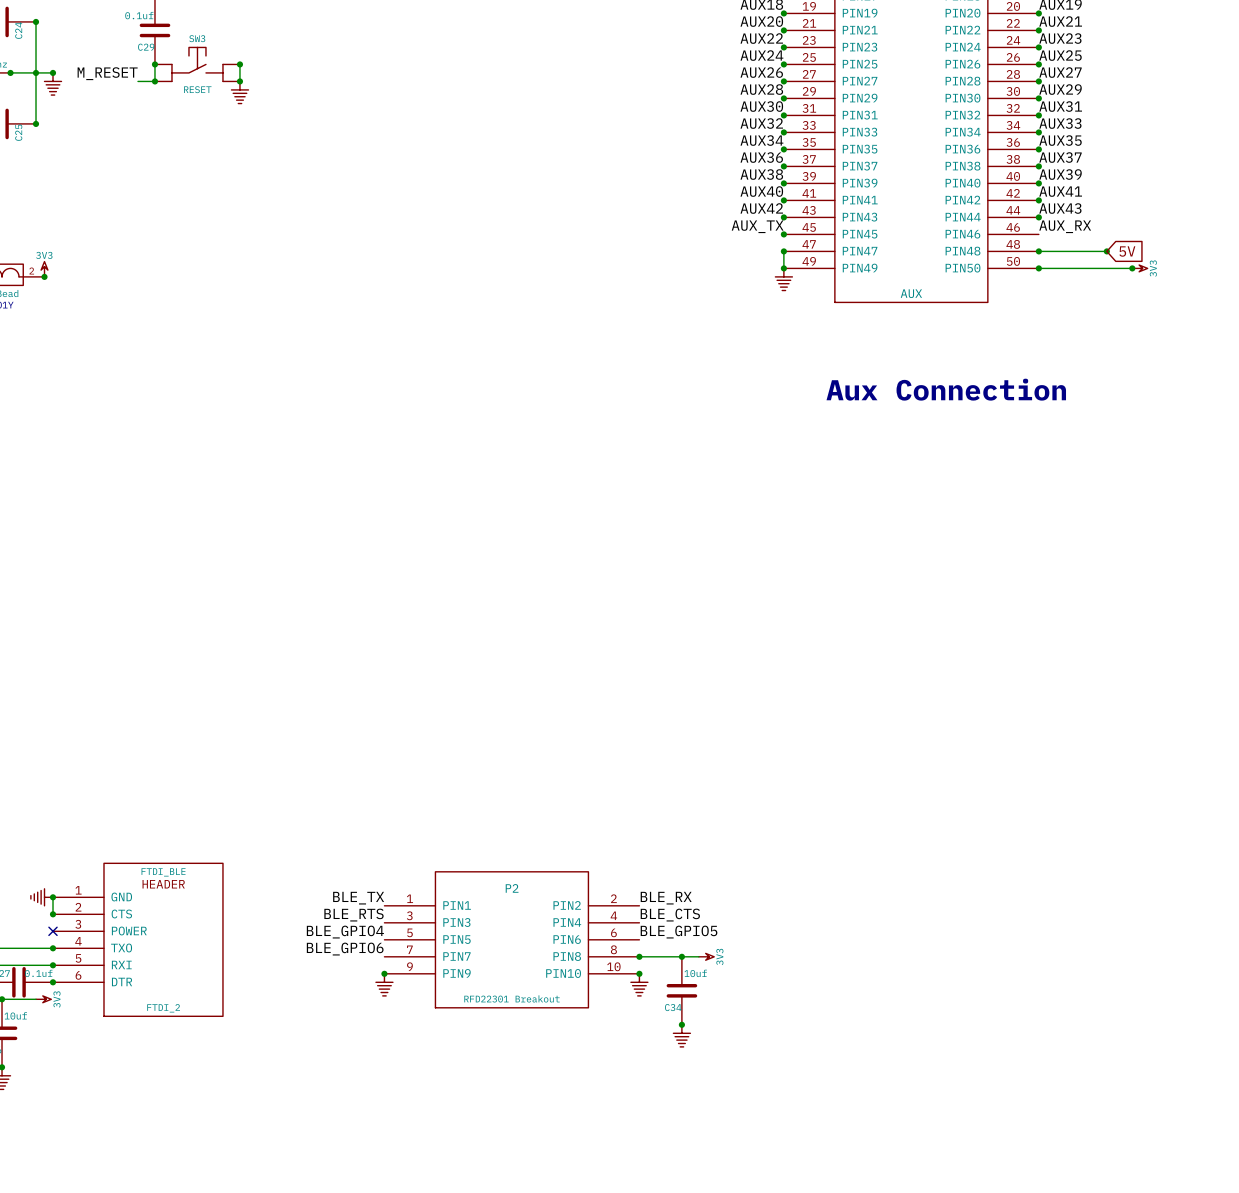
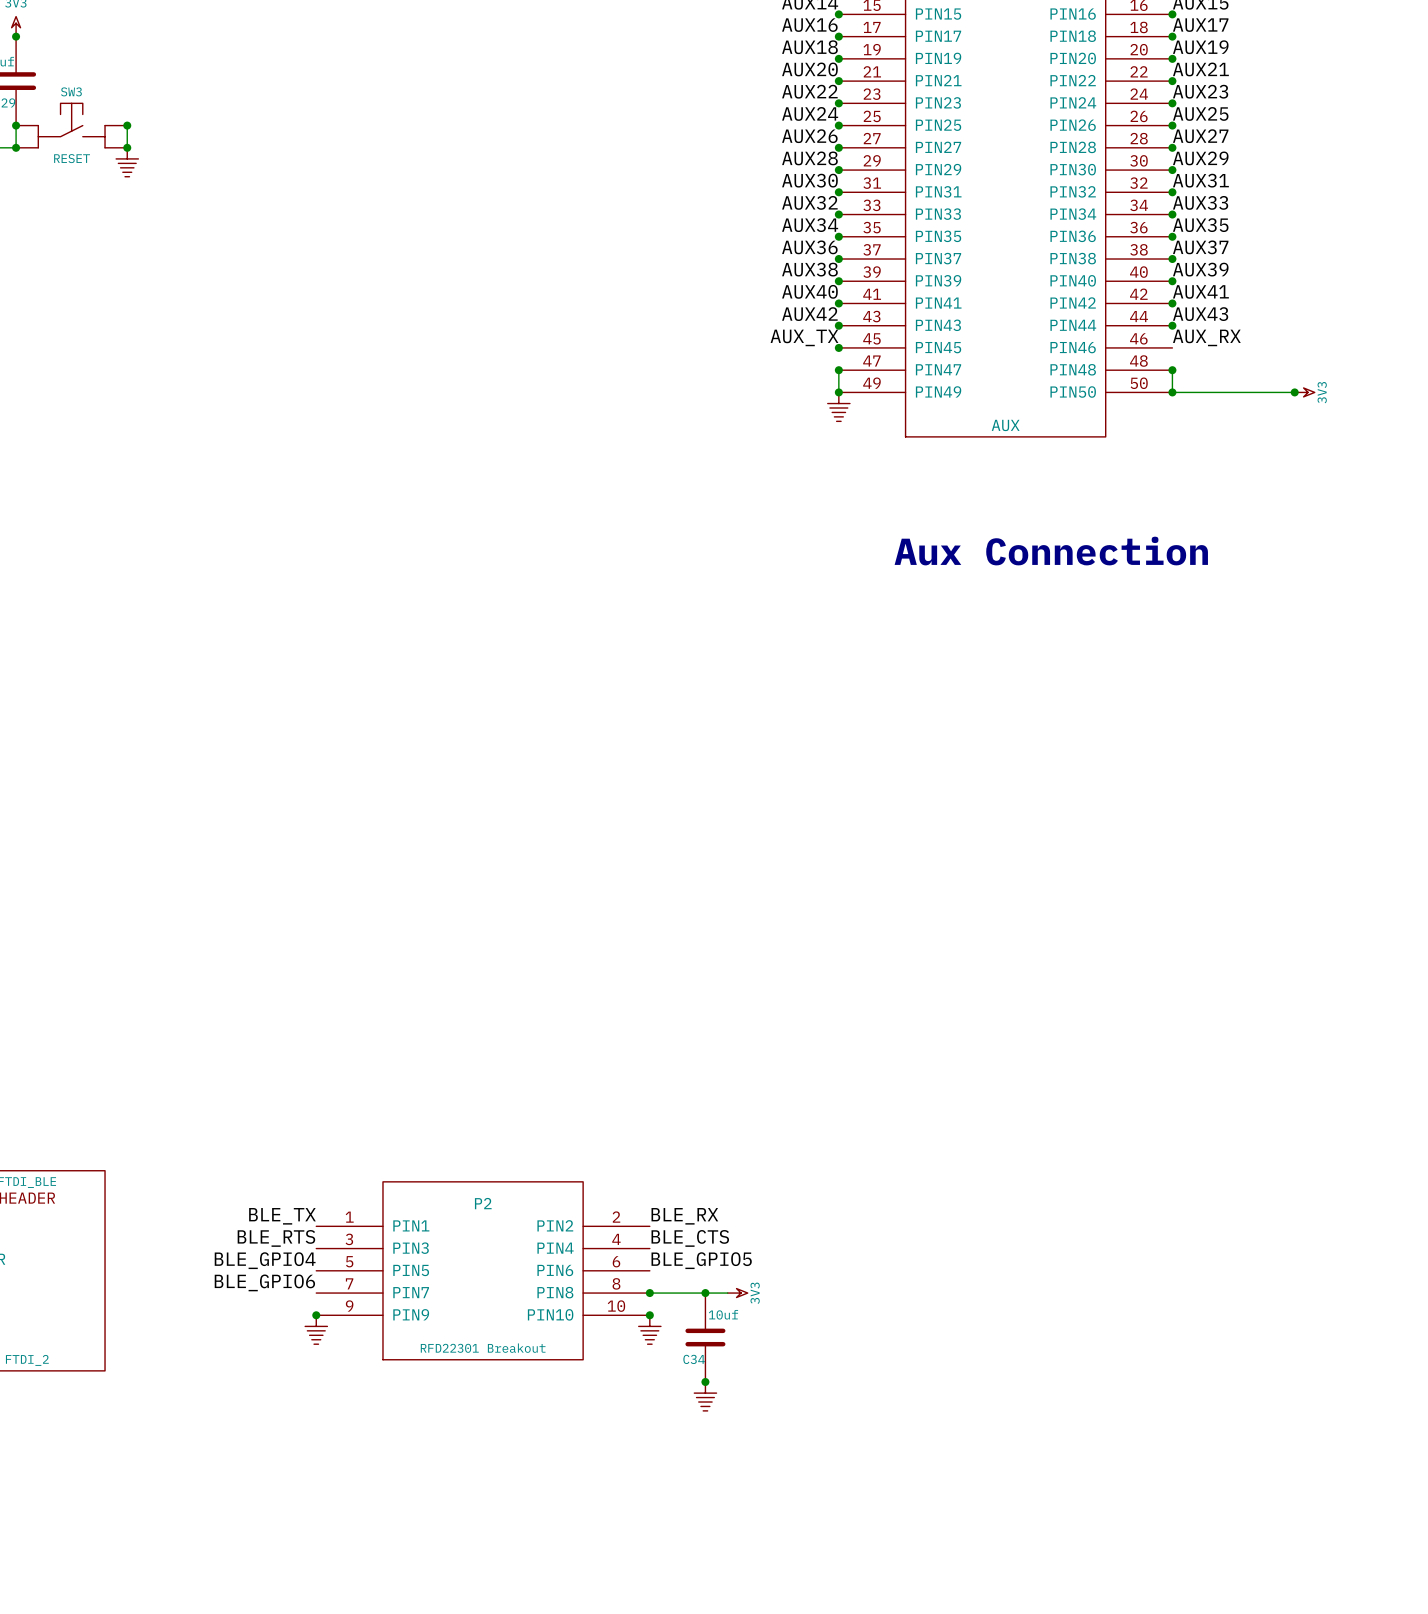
wire: (1038, 251) (1106, 251) -> (1172, 370) (1172, 392)
junction: (1106, 251) -> none
global label: 5V (1127, 251) -> none

